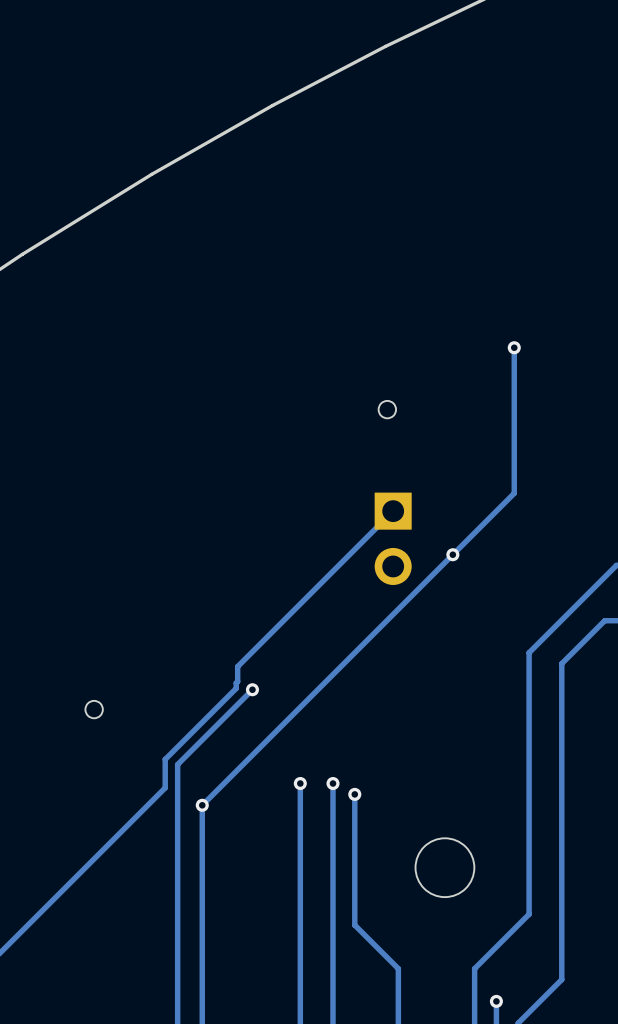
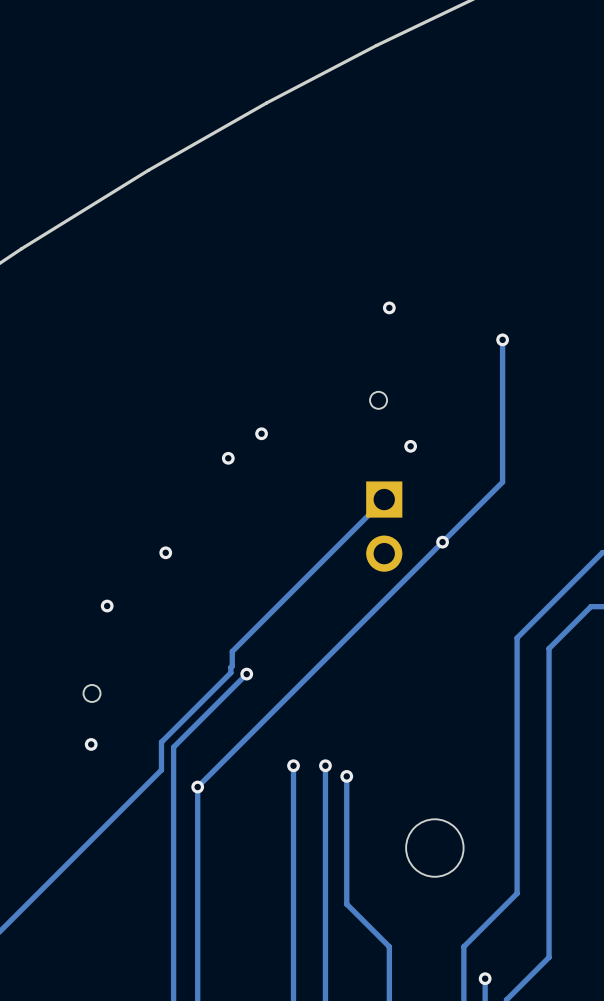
via: none -> (389, 307)
via: none -> (261, 433)
via: none -> (410, 446)
via: none -> (228, 458)
via: none -> (165, 552)
via: none -> (107, 606)
via: none -> (91, 744)

